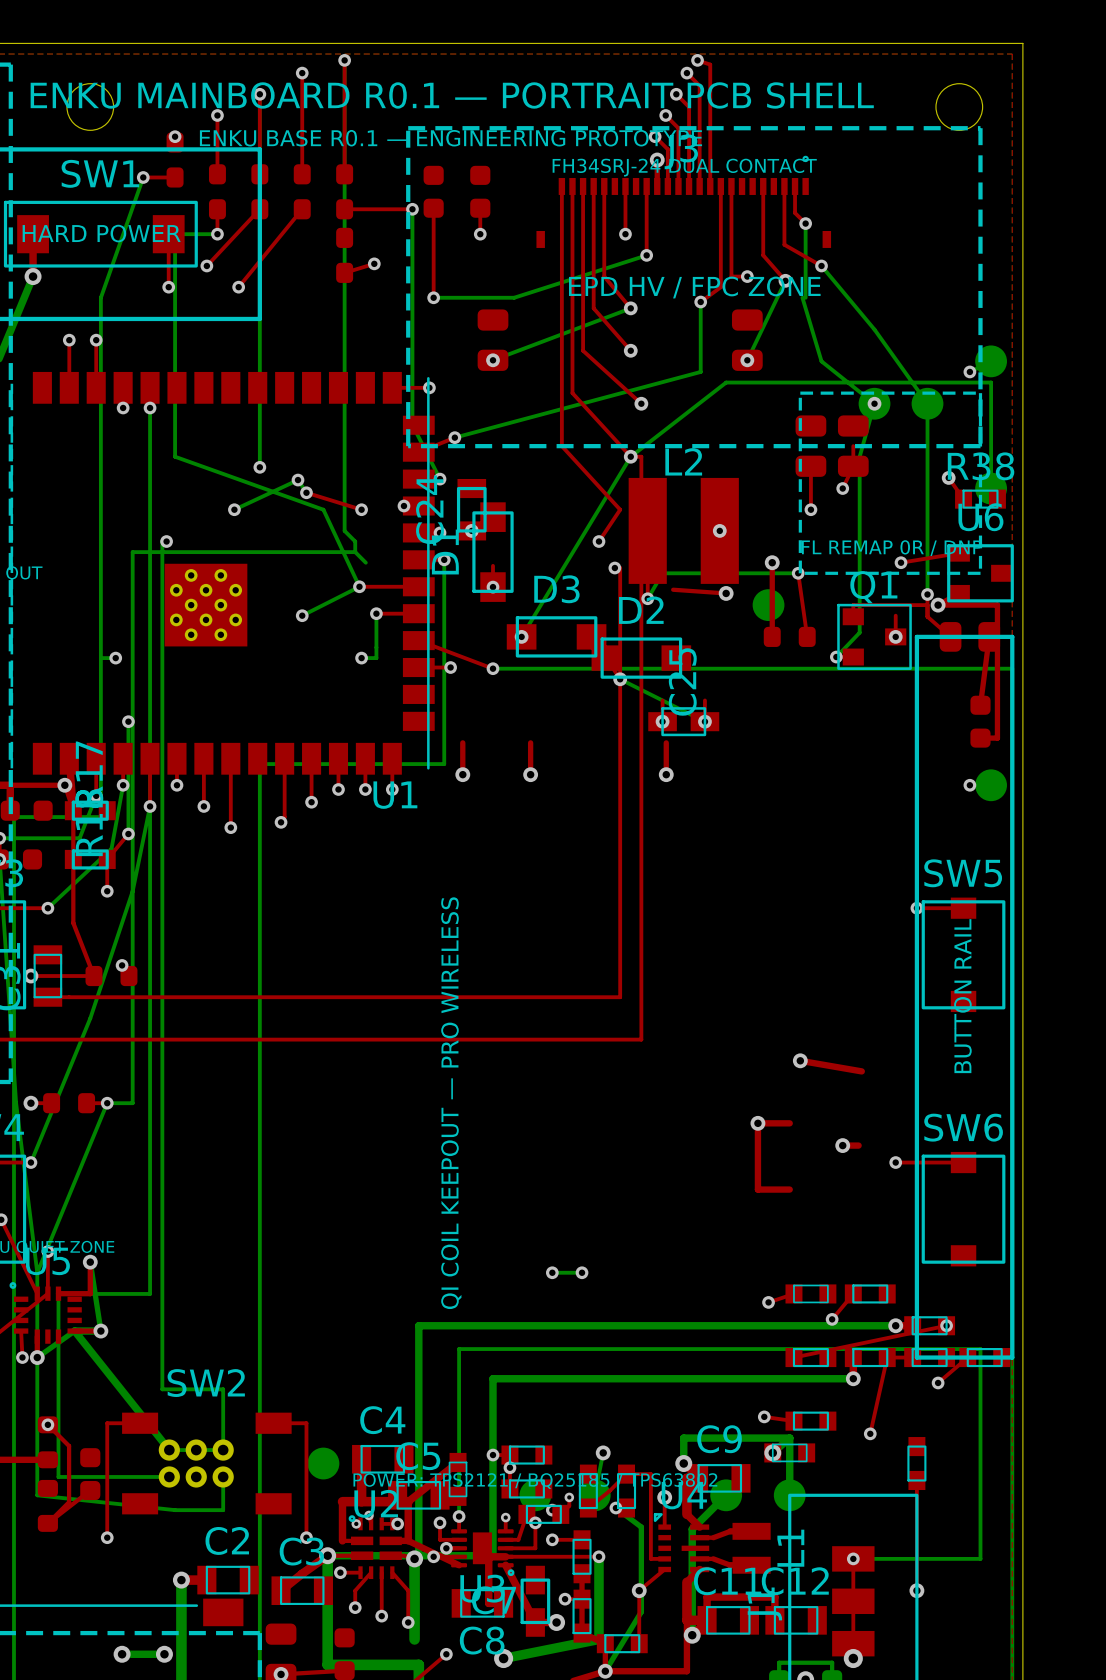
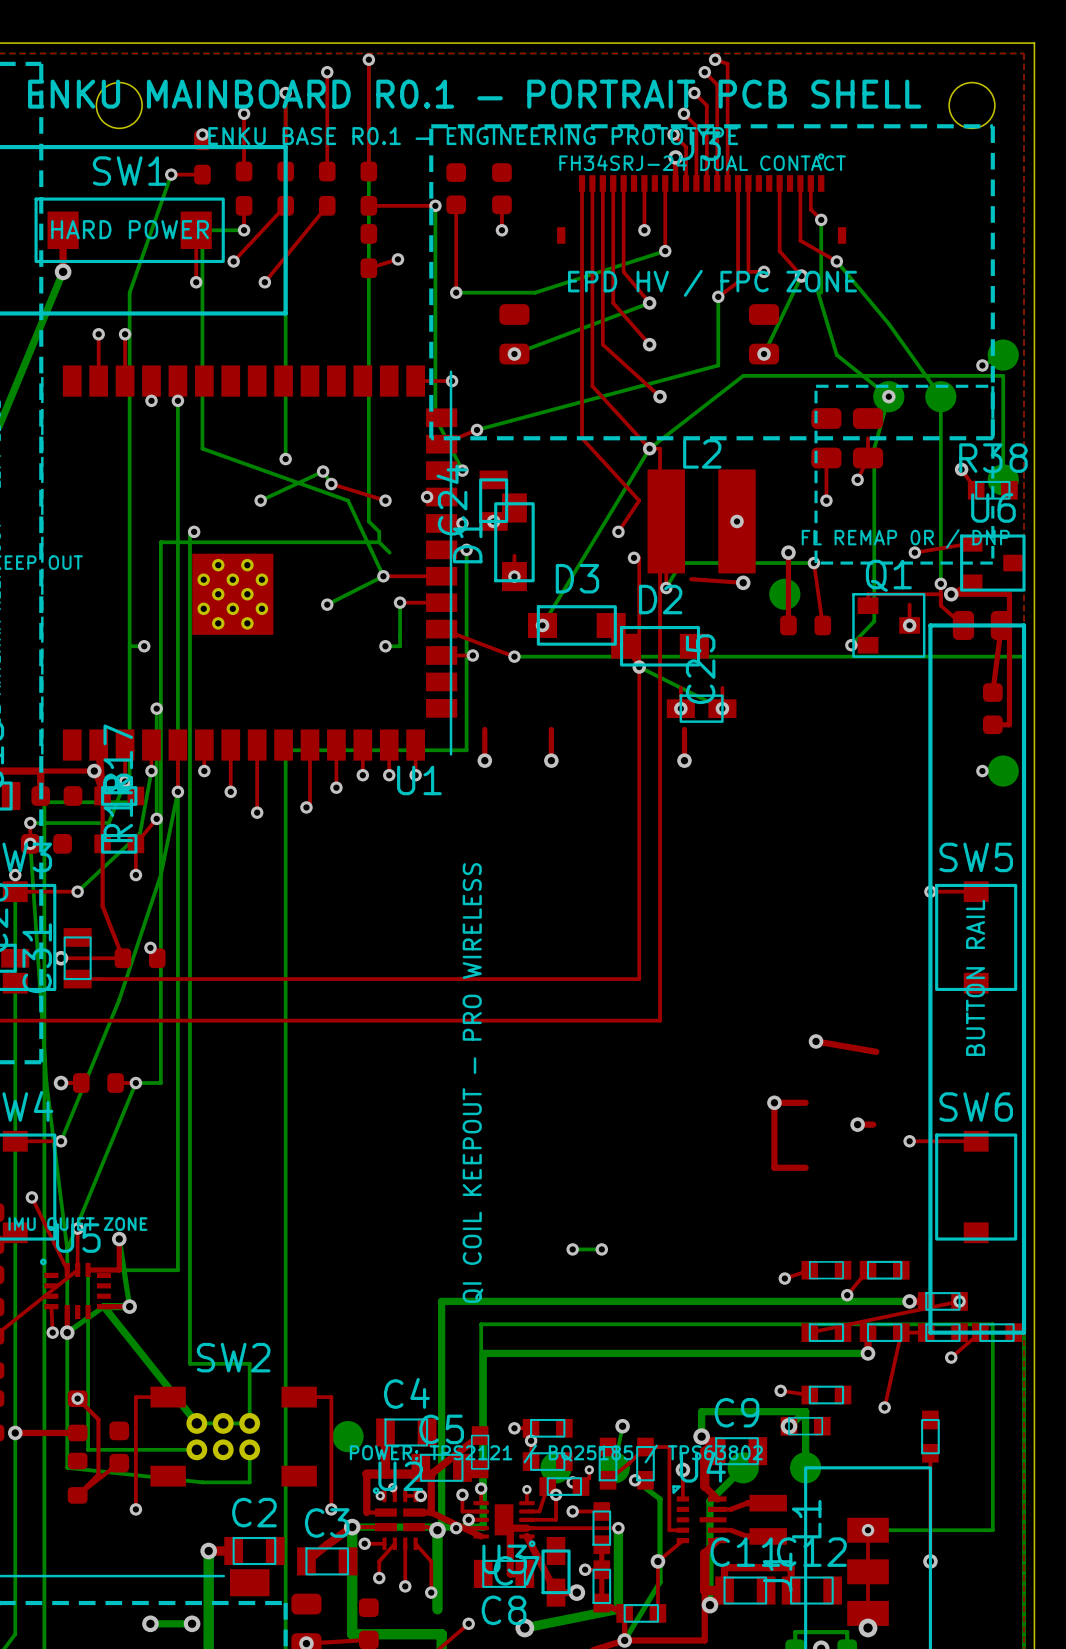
bottom track: (493, 1378) (493, 1555) (461, 1555) -> (514, 1353) (483, 1353) (483, 1527)

